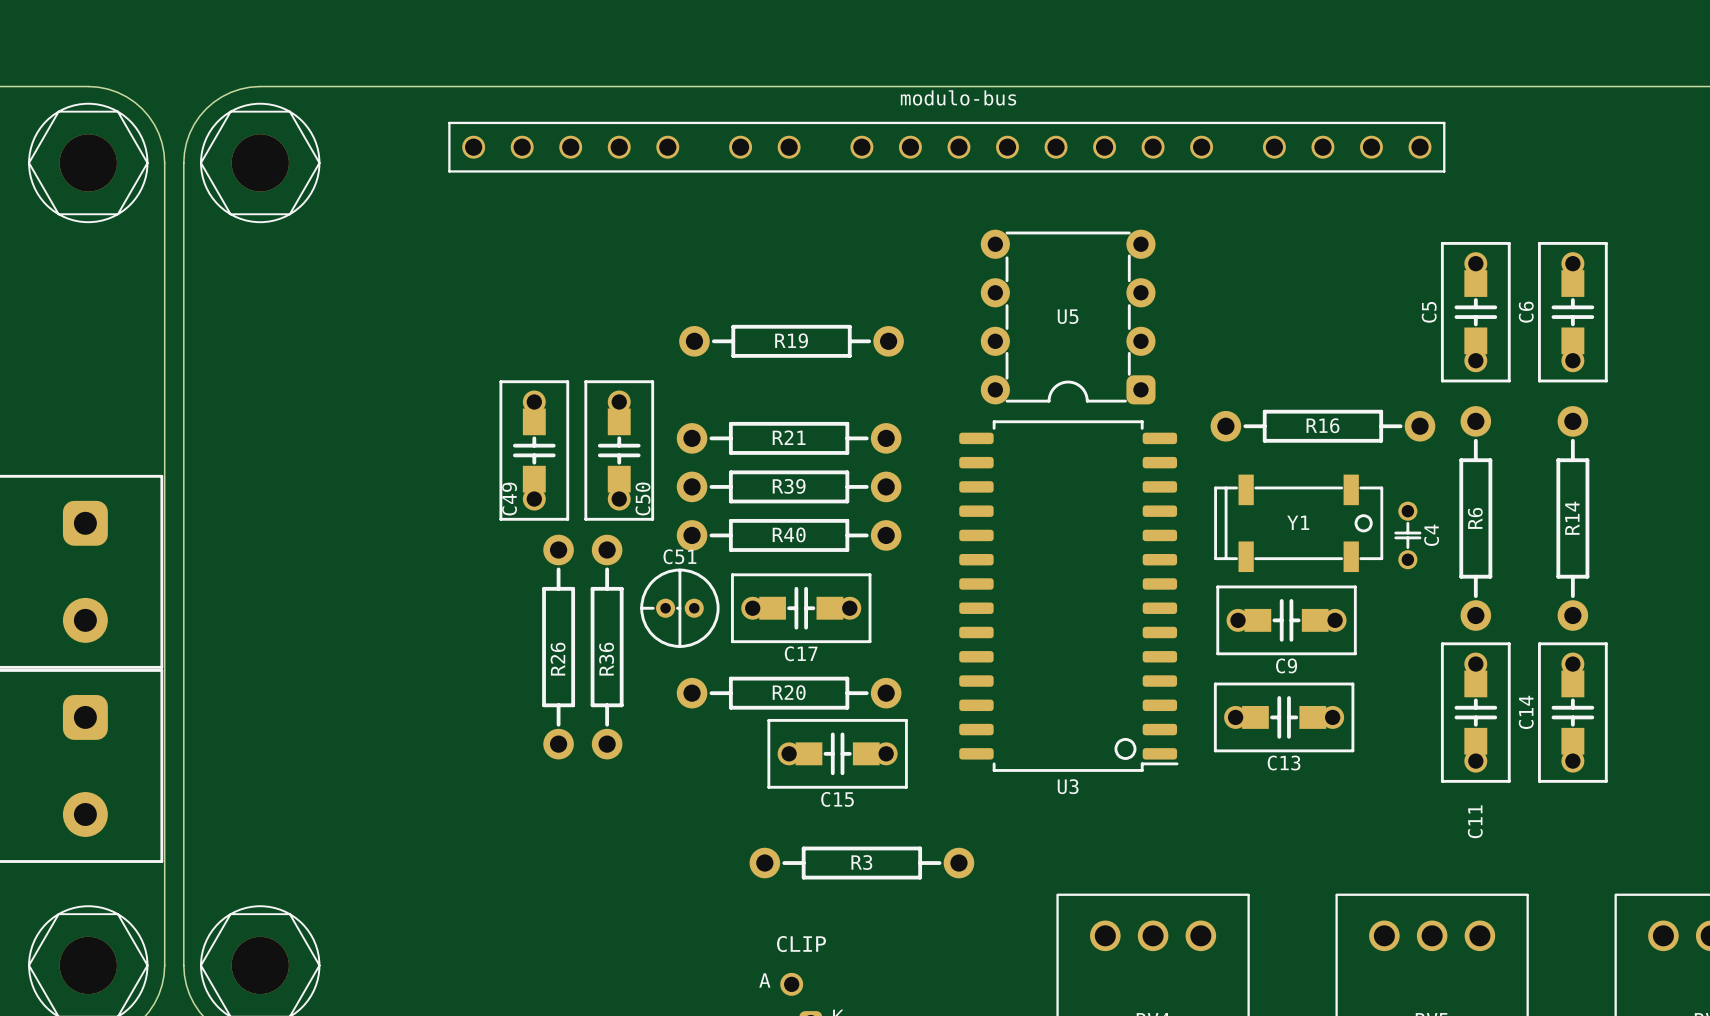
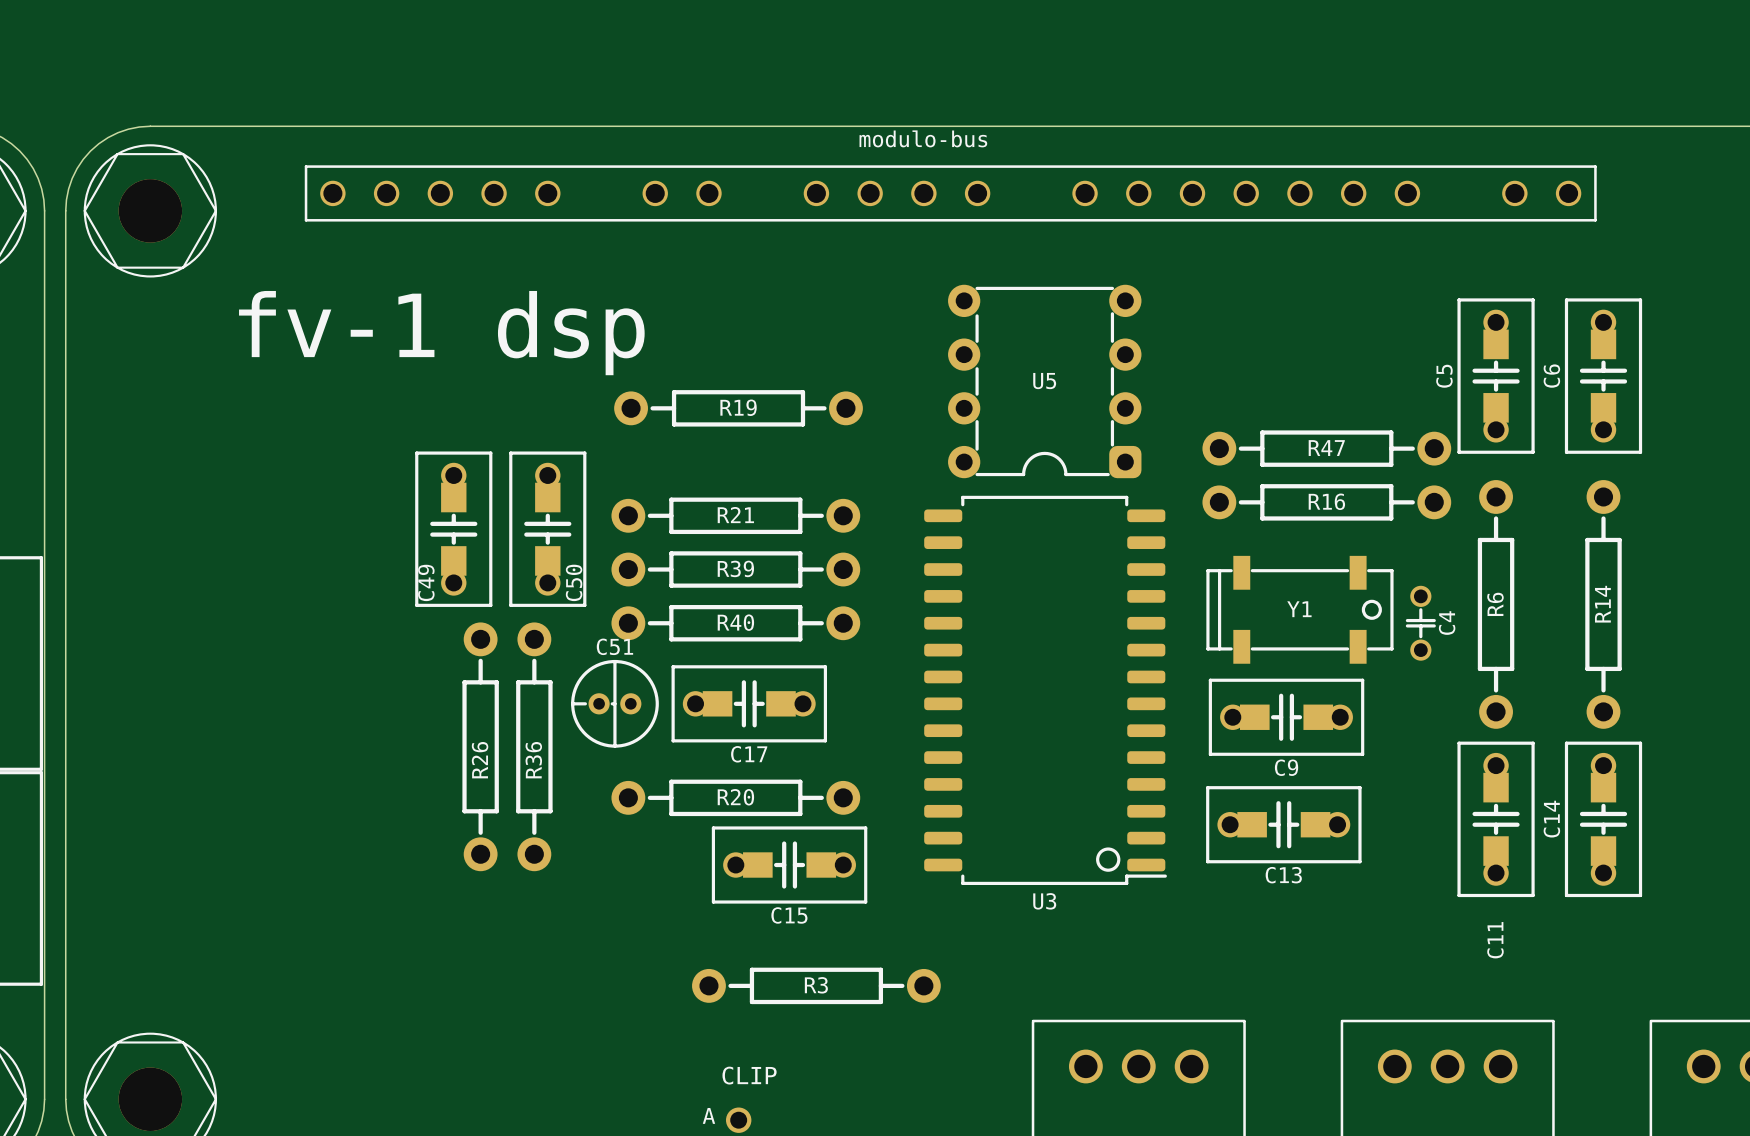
part: modulo-bus (946, 147) -> none
part: none -> modulo-bus (950, 193)
text: none -> fv-1 dsp (441, 333)
R47: none -> (1326, 448)

